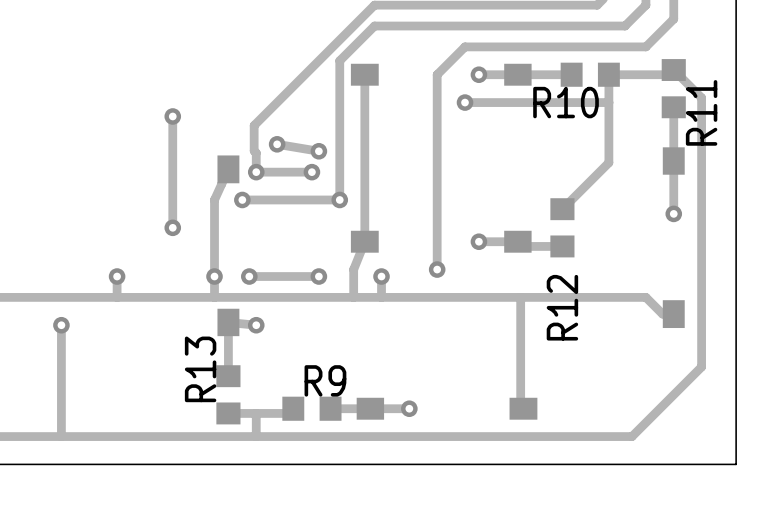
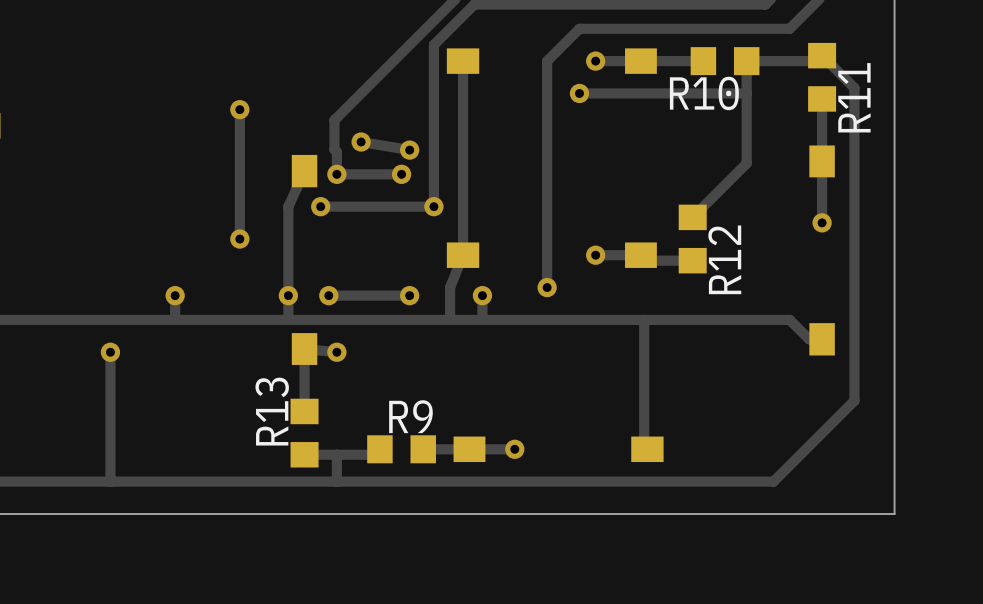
R12 name position: R12 (562, 307) -> R12 (724, 259)

